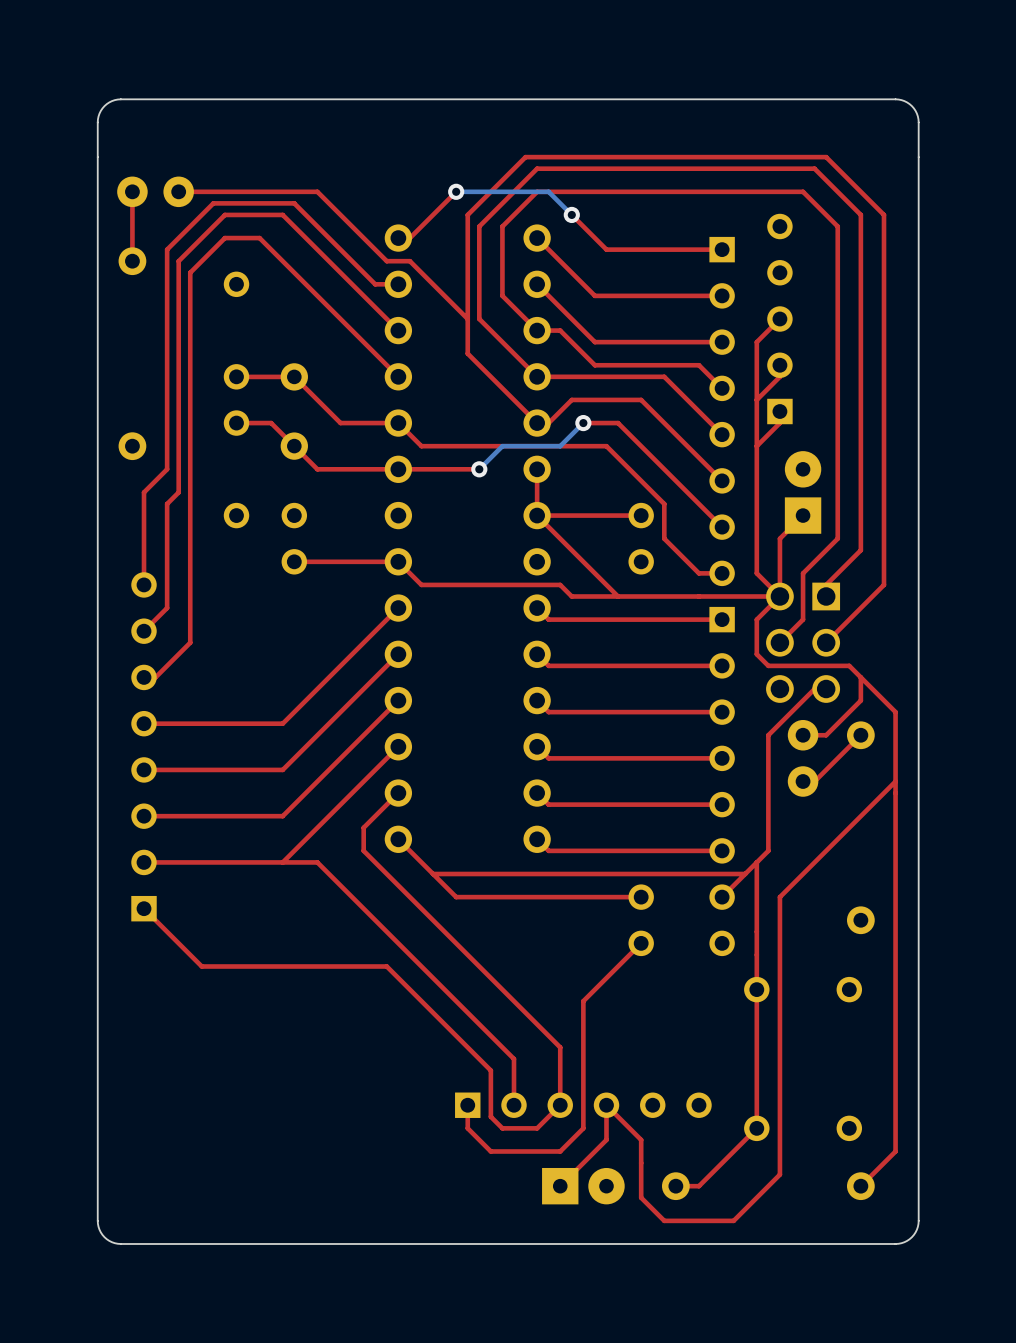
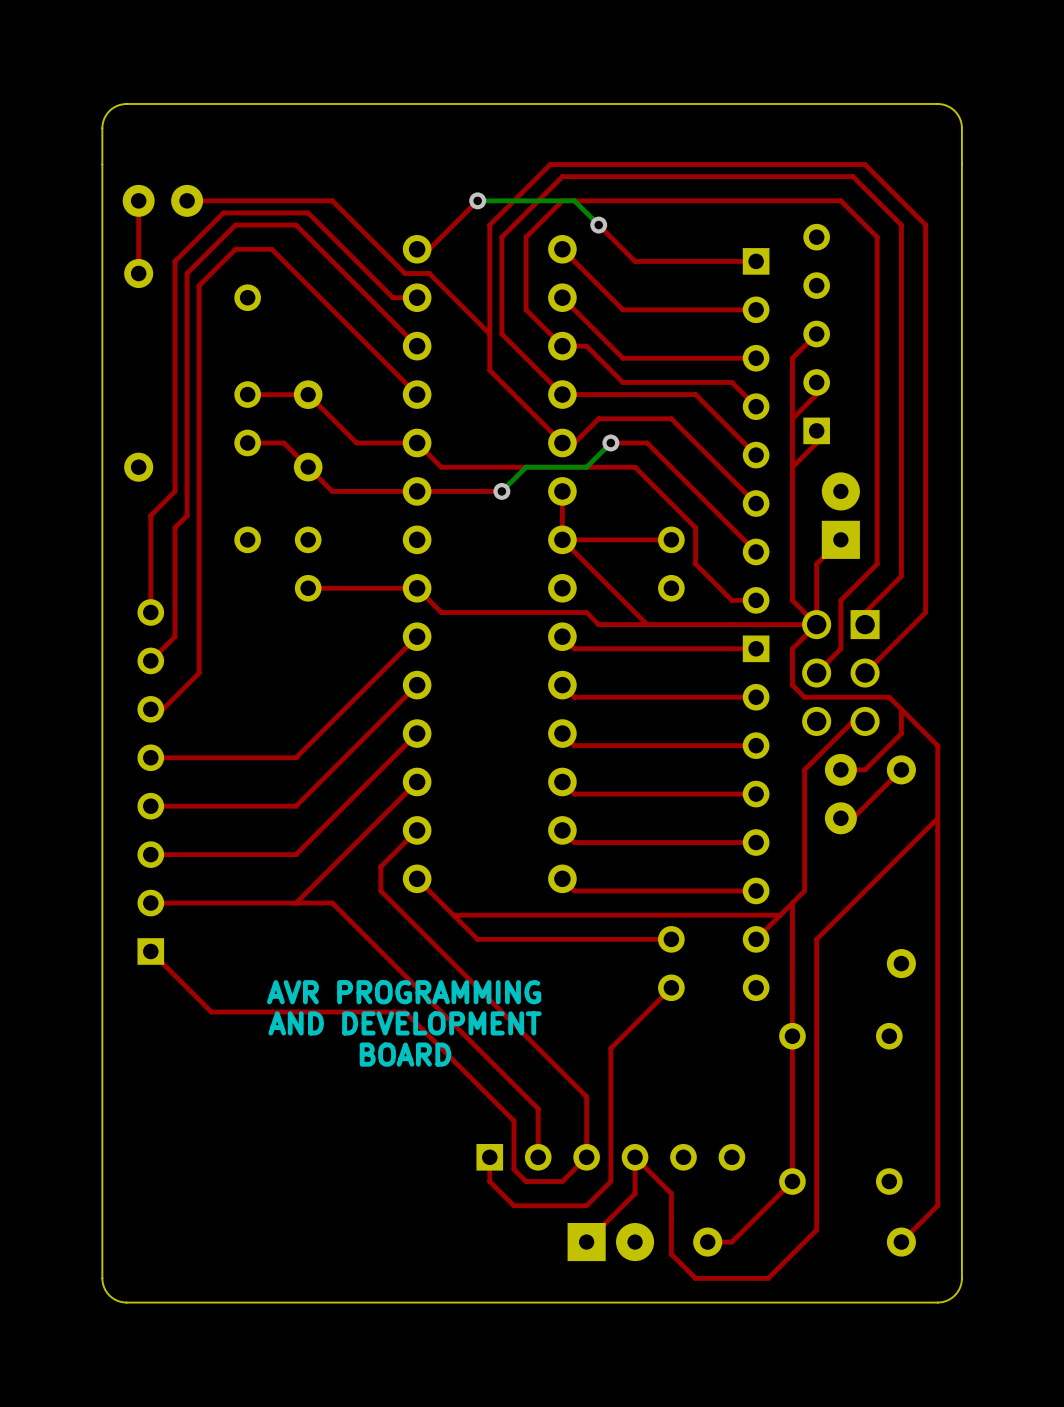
text: none -> AVR PROGRAMMING (404, 992)
text: none -> AND DEVELOPMENT (405, 1023)
text: none -> BOARD (405, 1054)

